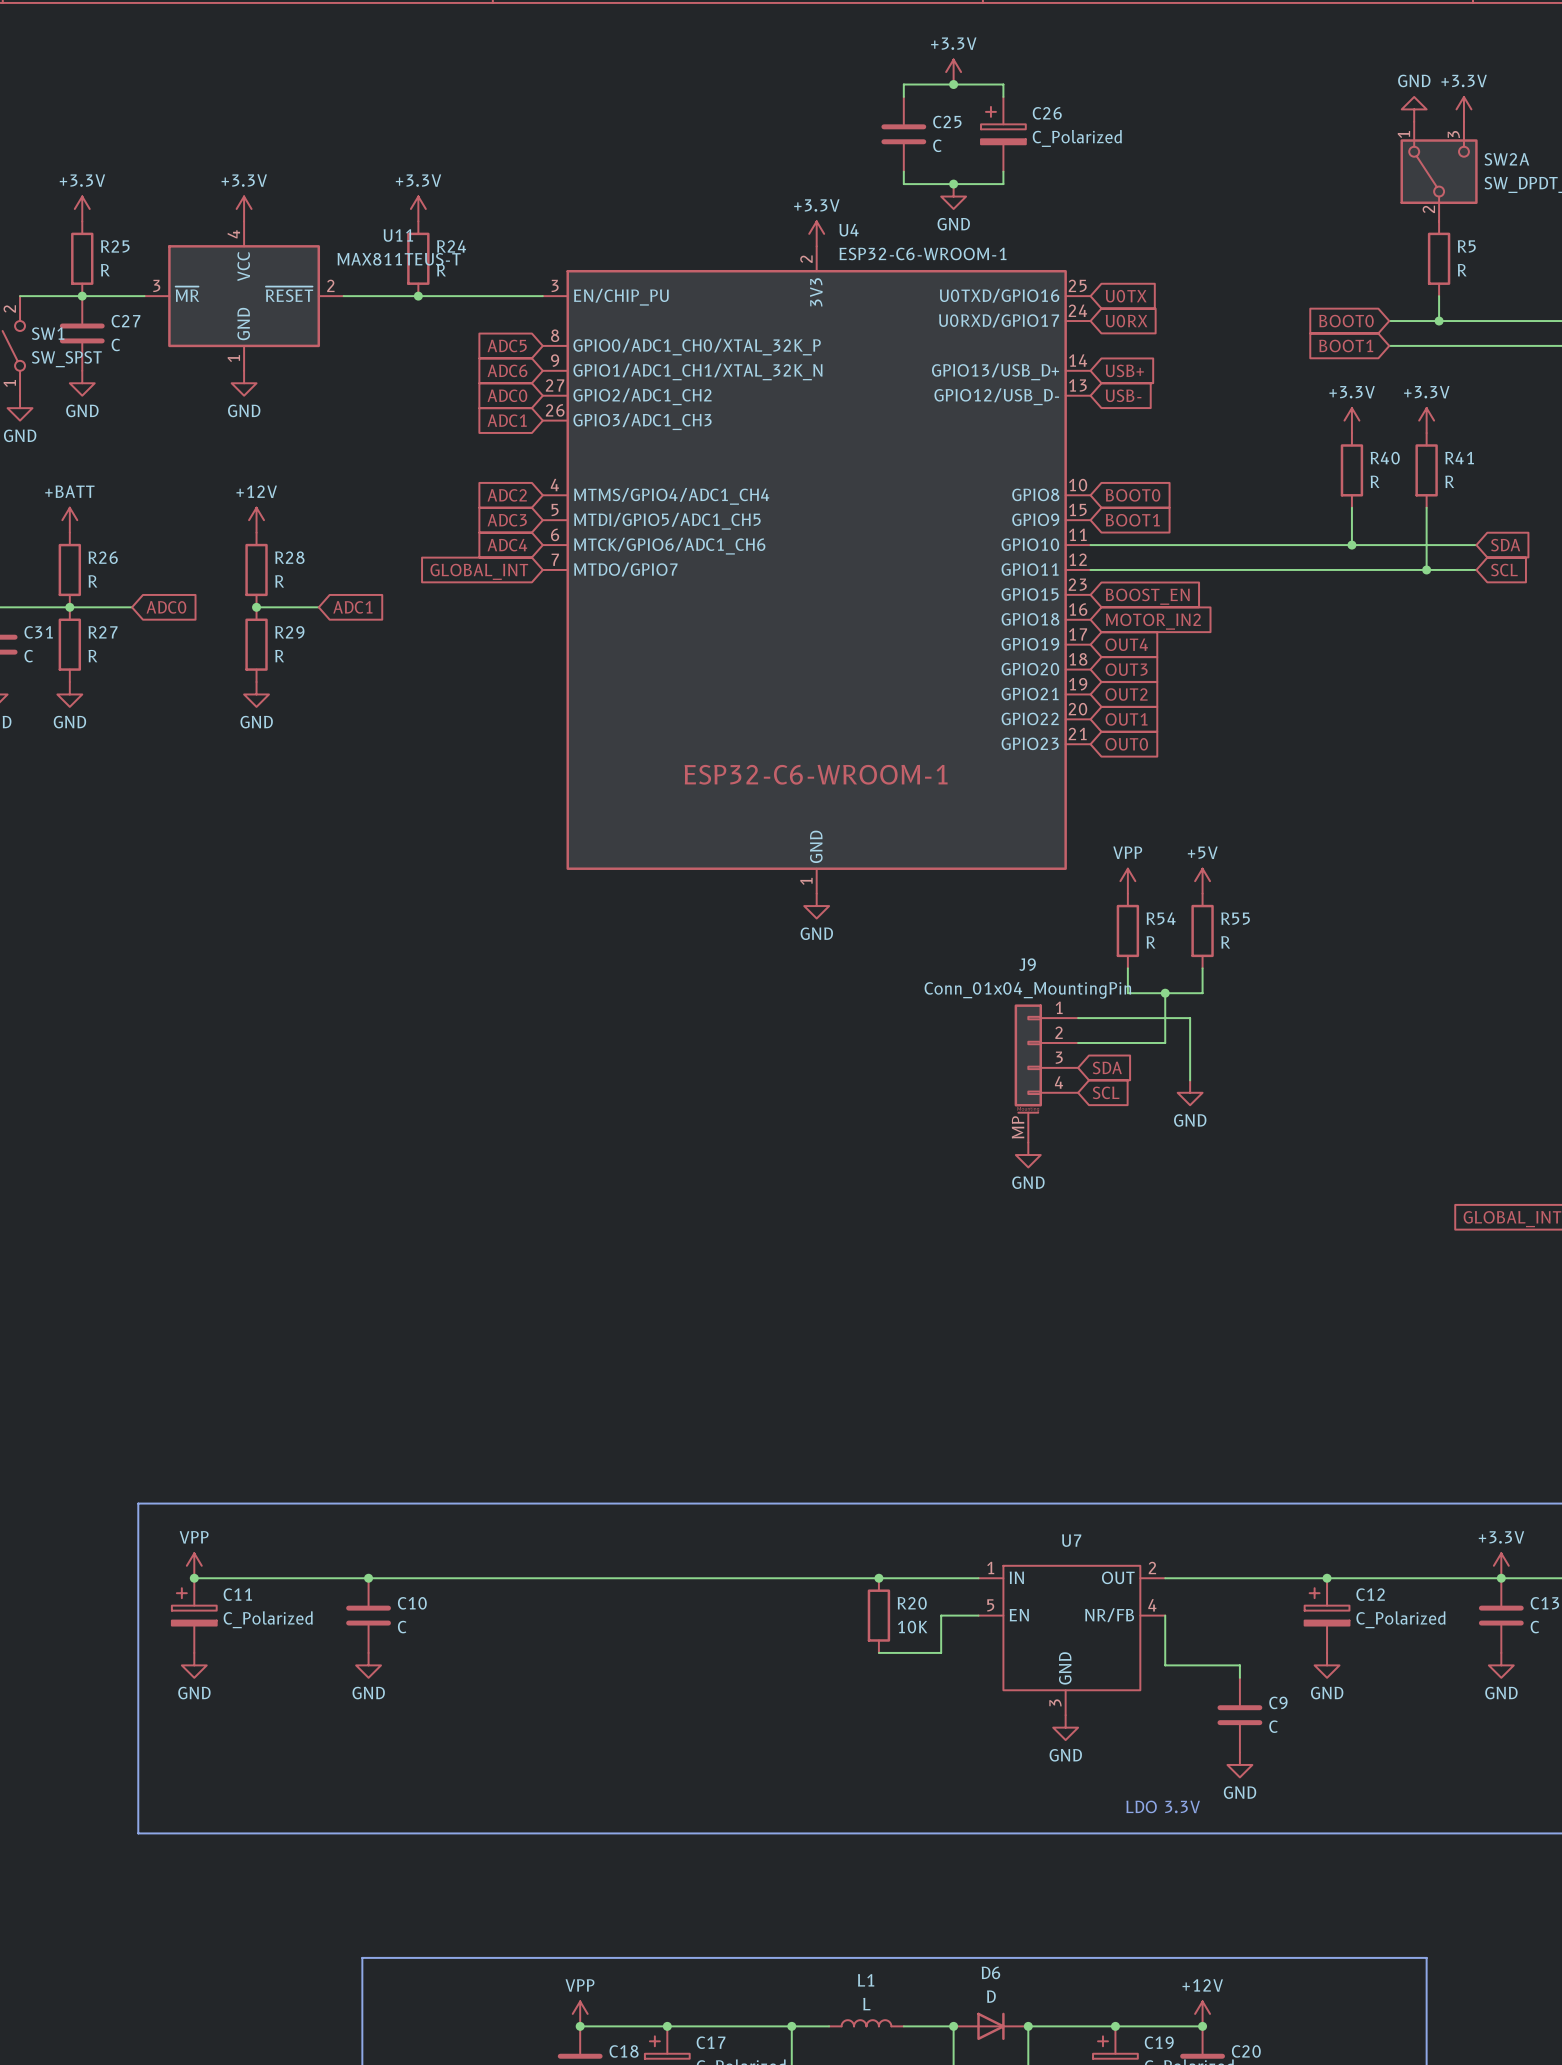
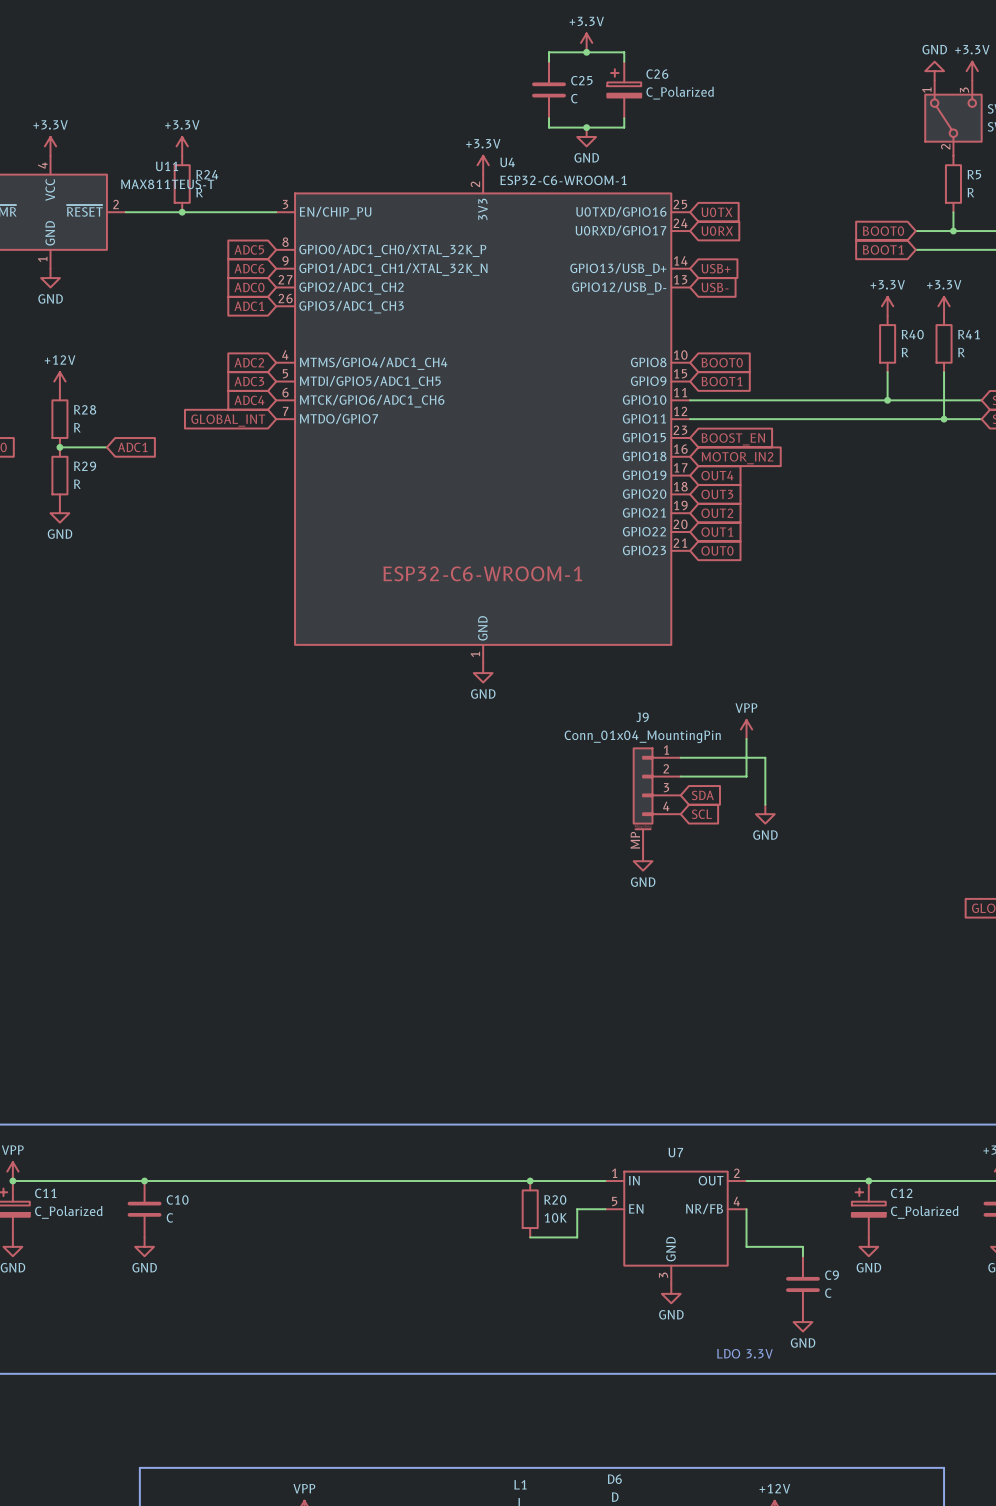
power symbol position: VPP (1127, 881) -> VPP (746, 729)
power symbol: +5V (1202, 881) -> none
R54: R (1127, 930) -> none
R55: R (1202, 930) -> none
wire: (1127, 968) (1127, 993) (1202, 993) (1202, 968) -> none
junction: (1165, 993) -> none

